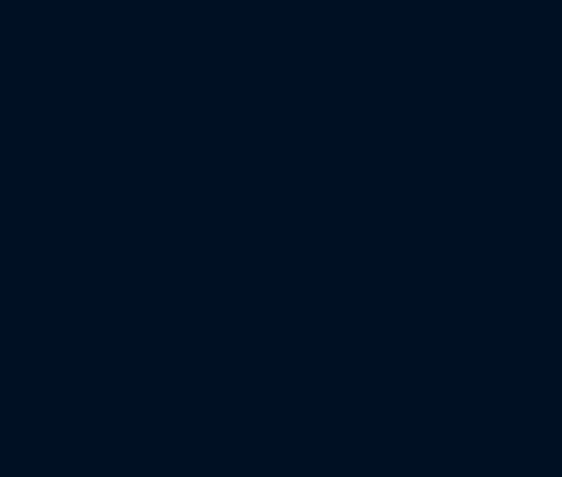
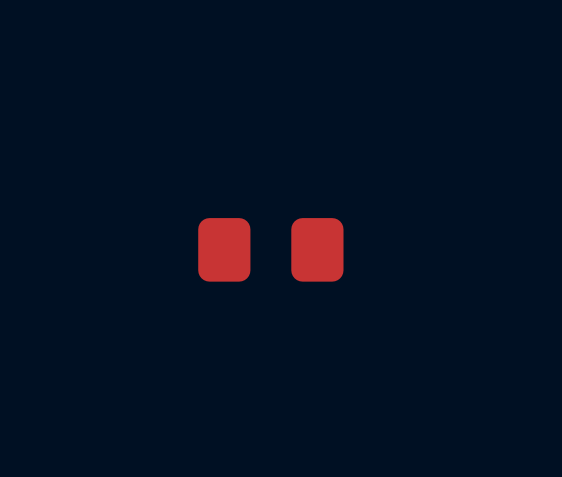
part: none -> (270, 249)

